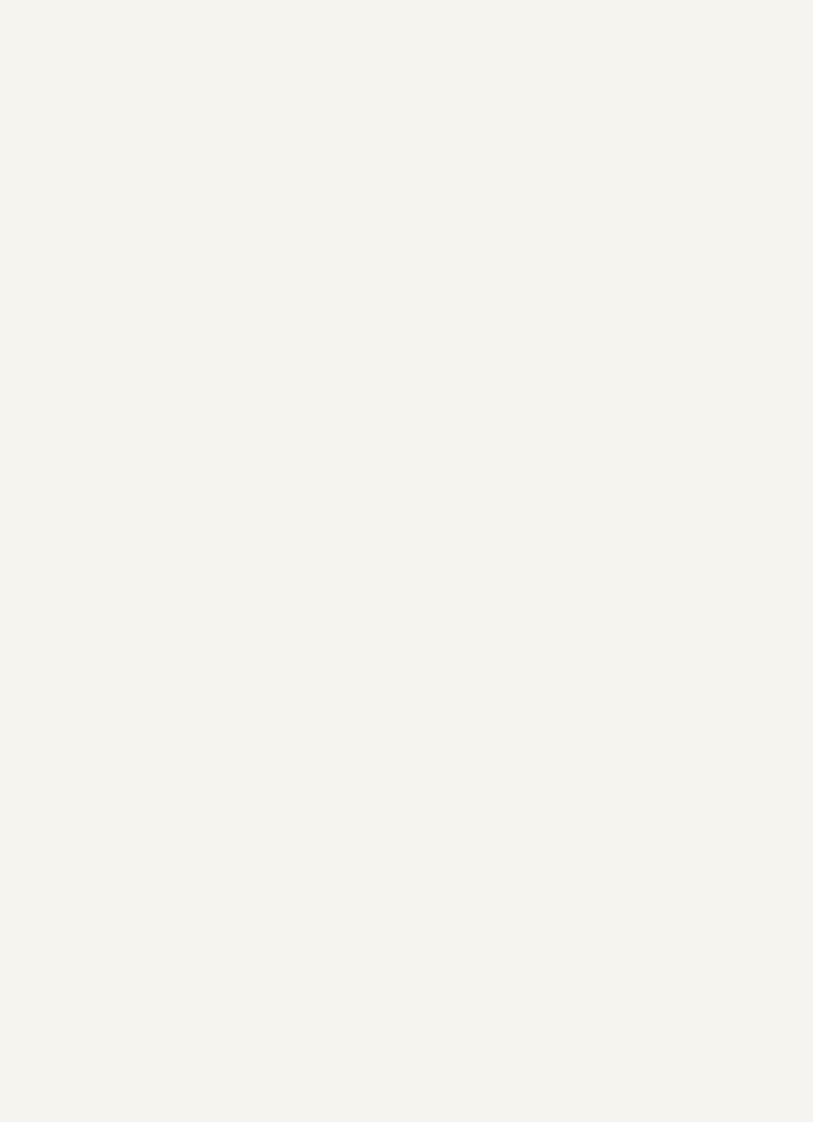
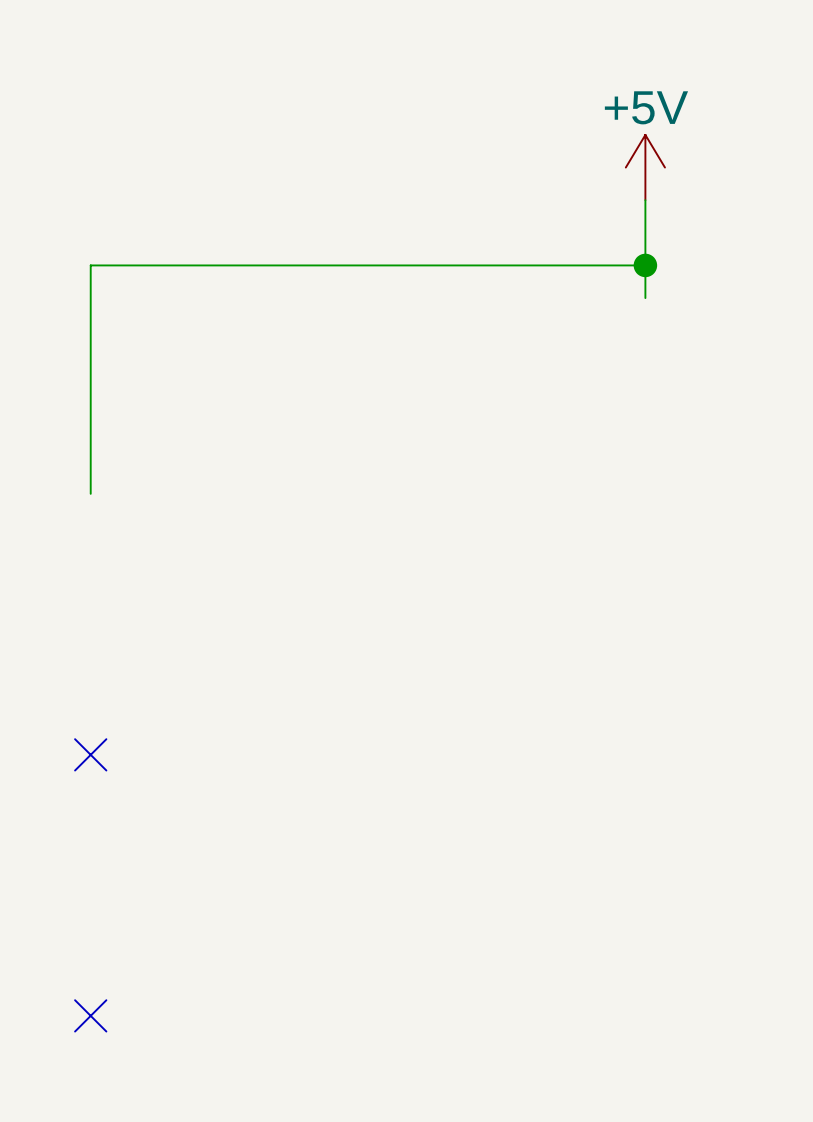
power symbol: none -> +5V (645, 167)
wire: none -> (645, 200) (645, 298)
wire: none -> (645, 265) (90, 265) (90, 493)
junction: none -> (645, 265)
no-connect mark: none -> (90, 754)
no-connect mark: none -> (90, 1015)

